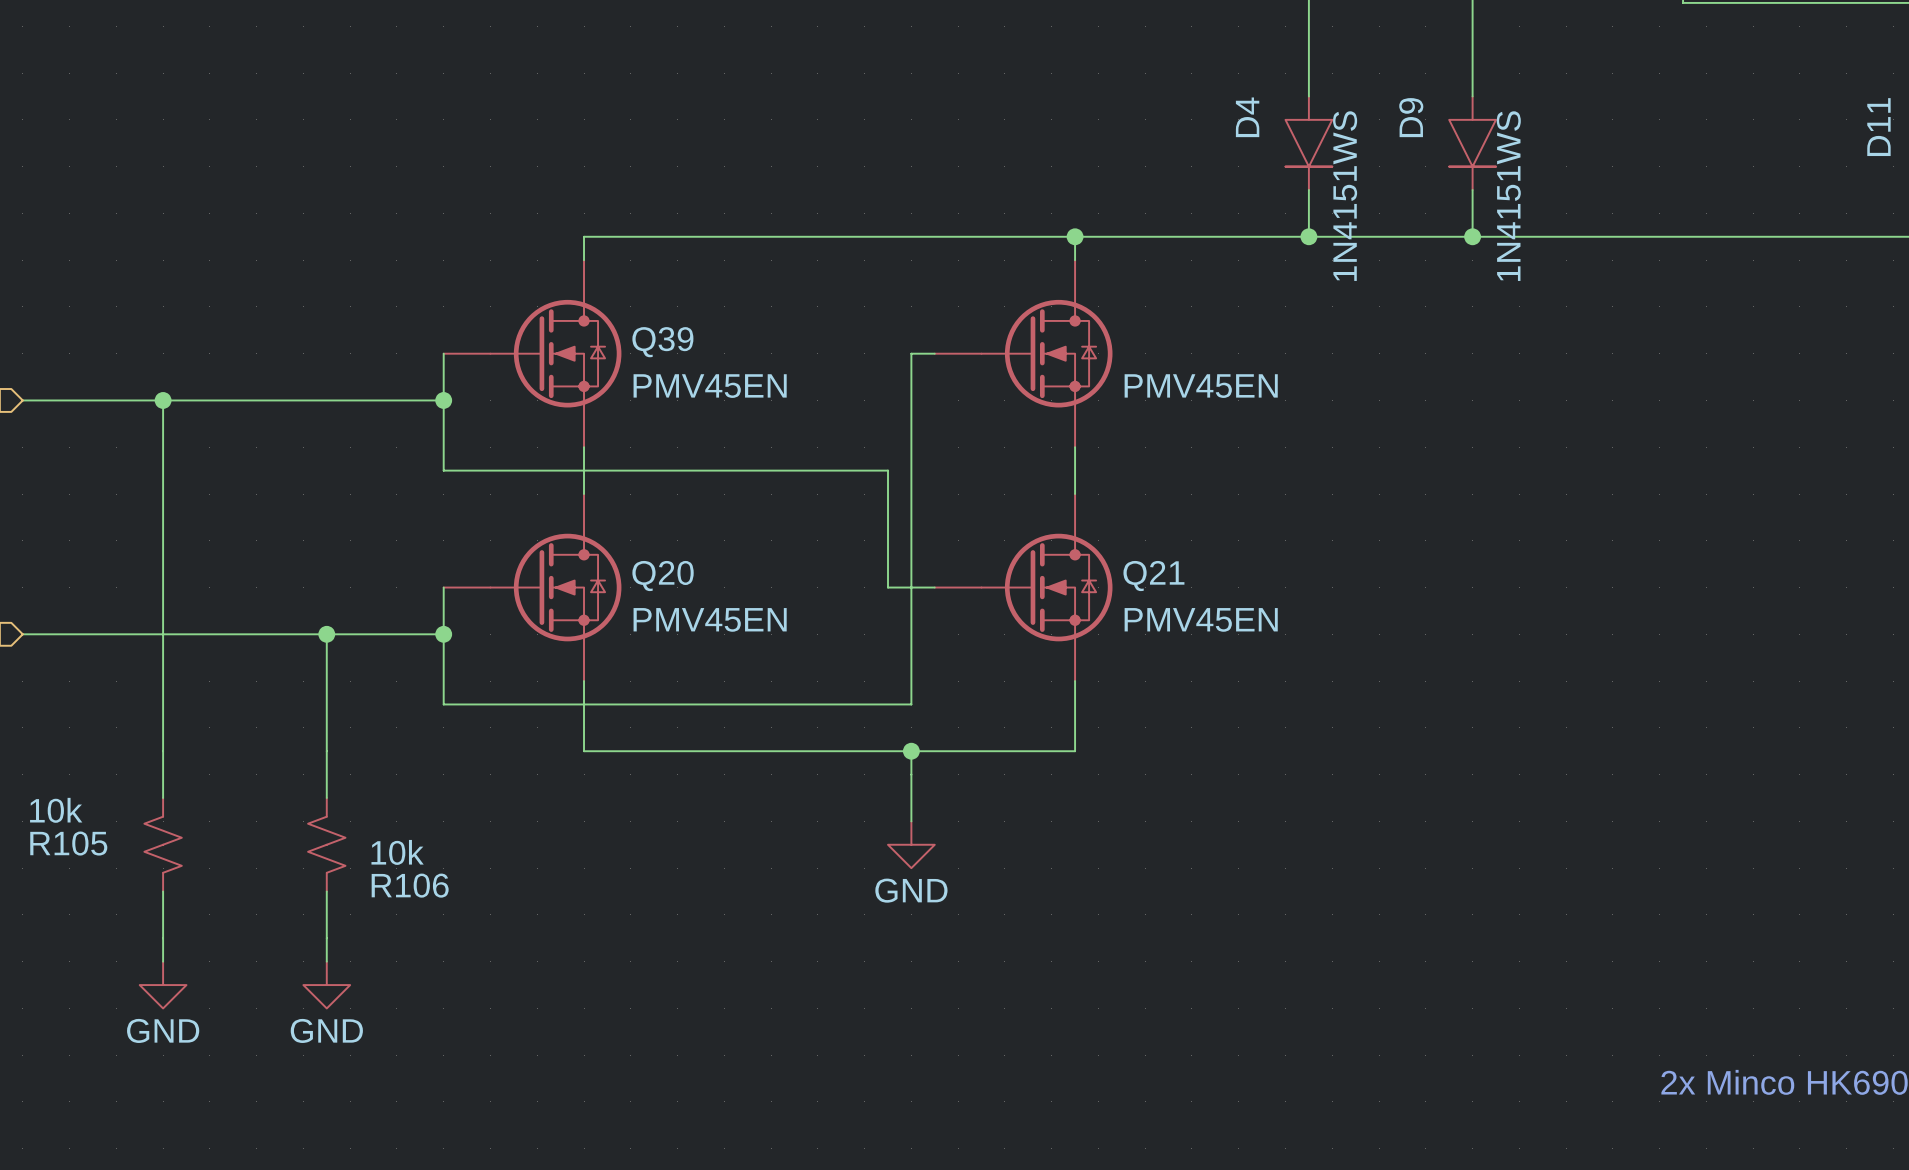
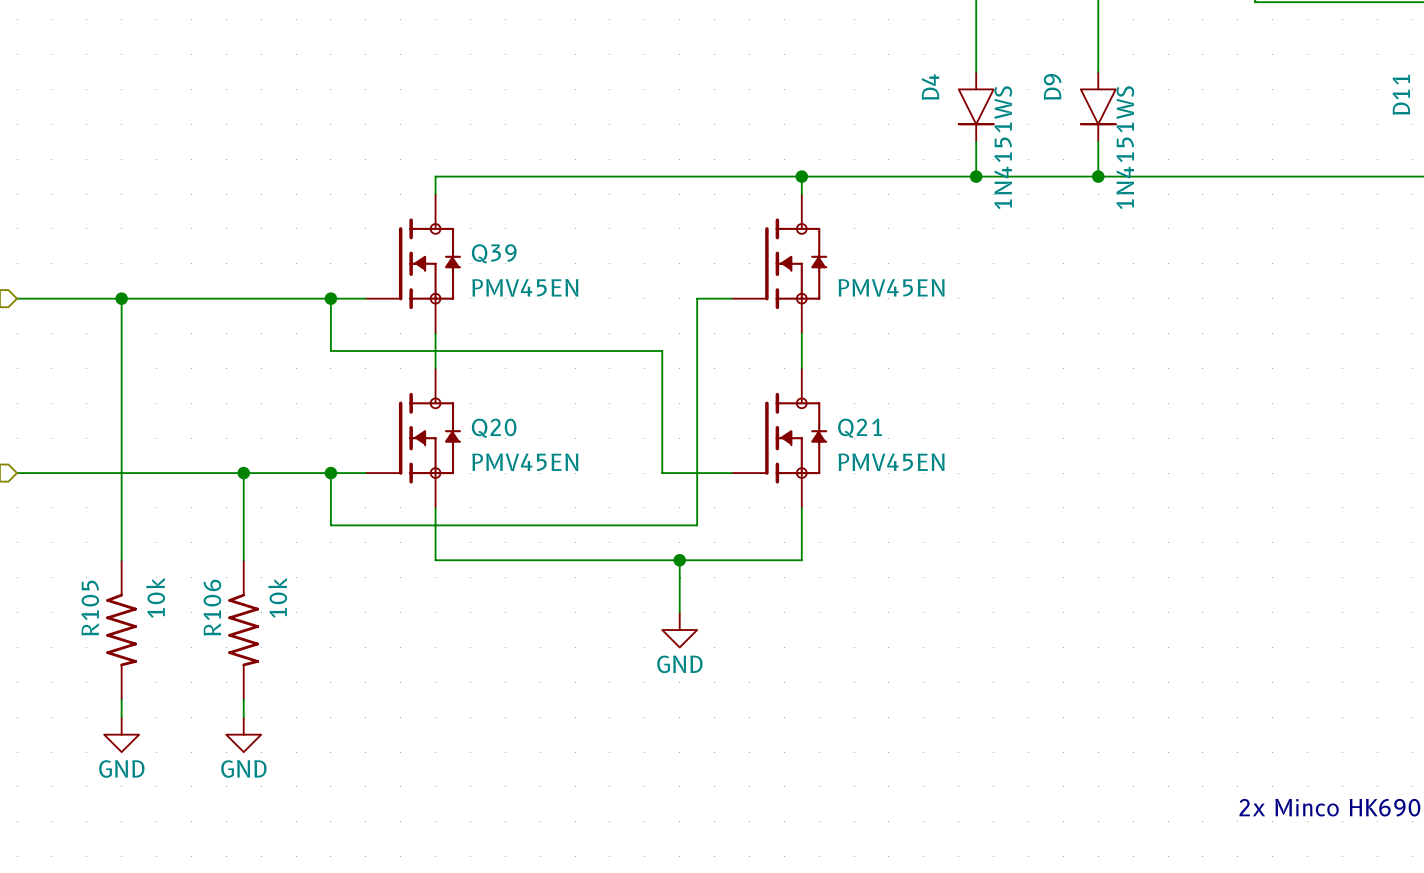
Q39 symbol: [443, 260, 622, 448] -> [365, 194, 462, 334]
wire: (443, 353) (443, 400) -> (365, 298) (330, 298)
wire: (934, 353) (911, 353) (911, 704) -> (732, 298) (697, 298) (697, 525) (679, 525)
part: PMV45EN (1023, 353) -> none
part: none -> PMV45EN (779, 263)
Q20 symbol: [443, 494, 622, 682] -> [365, 368, 462, 508]
Q21 symbol: [934, 494, 1113, 682] -> [732, 368, 828, 508]
wire: (443, 587) (443, 634) -> (365, 473) (330, 473)
wire: (888, 587) (934, 587) -> (662, 438) (662, 473) (732, 473)
R105 symbol: [144, 797, 182, 892] -> [106, 560, 137, 700]
R106 symbol: [308, 797, 346, 892] -> [228, 560, 260, 700]
R105 value position: 10k (56, 810) -> 10k (155, 597)
R105 name position: R105 (68, 843) -> R105 (90, 608)
R106 value position: 10k (397, 852) -> 10k (277, 597)
R106 name position: R106 (410, 885) -> R106 (212, 607)

